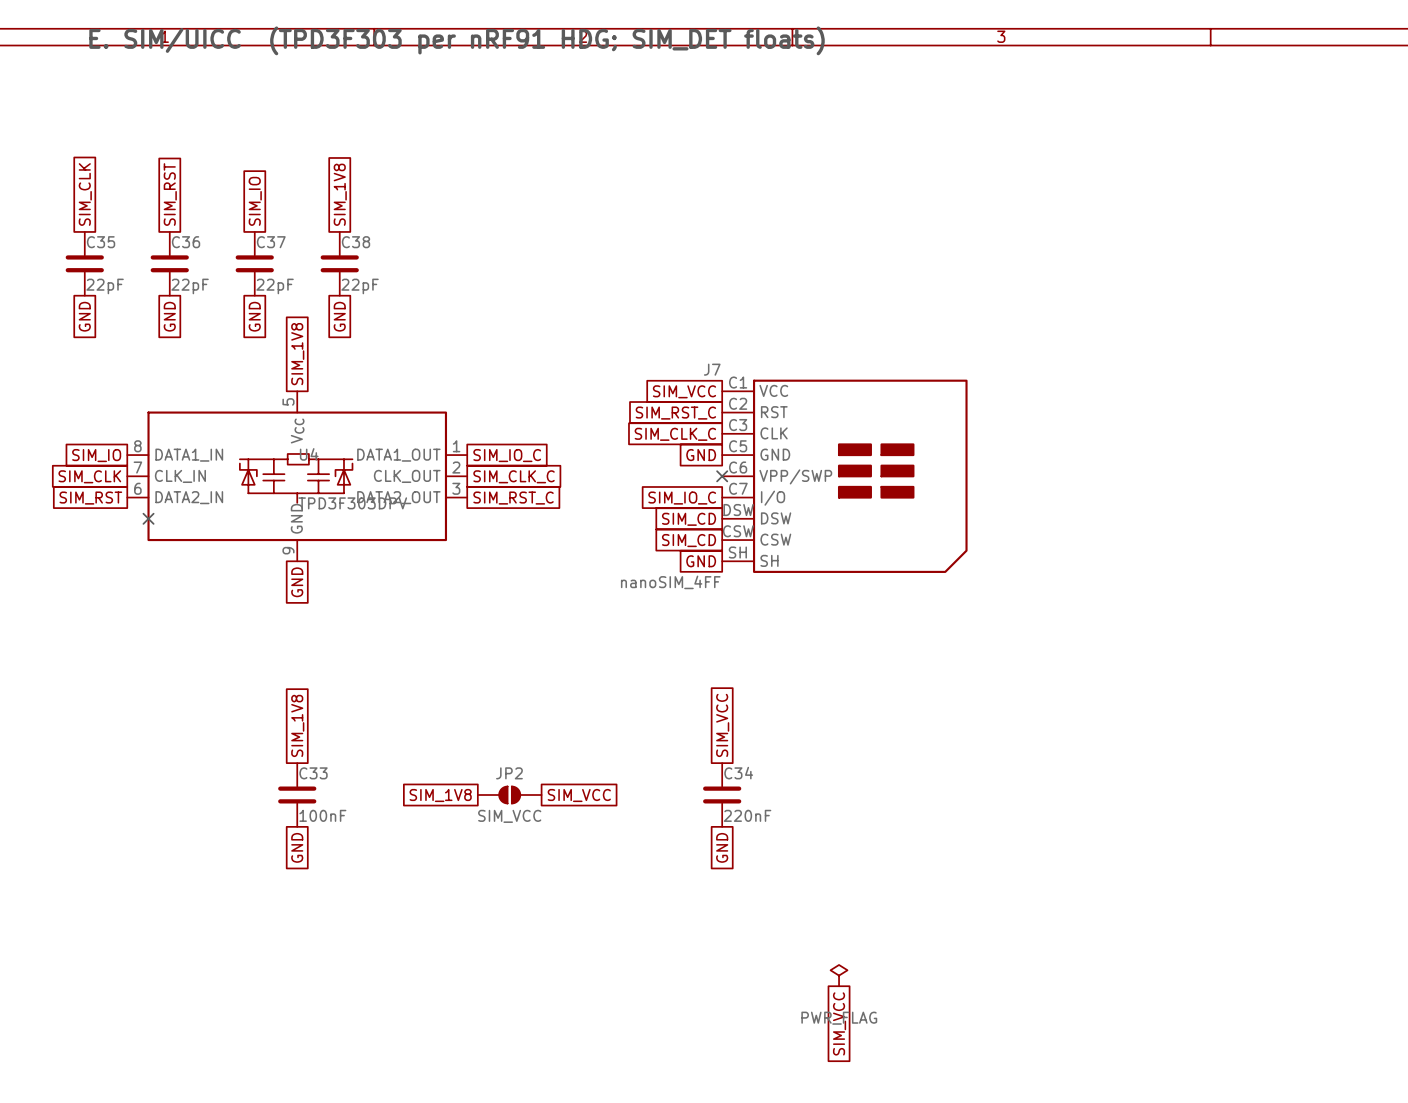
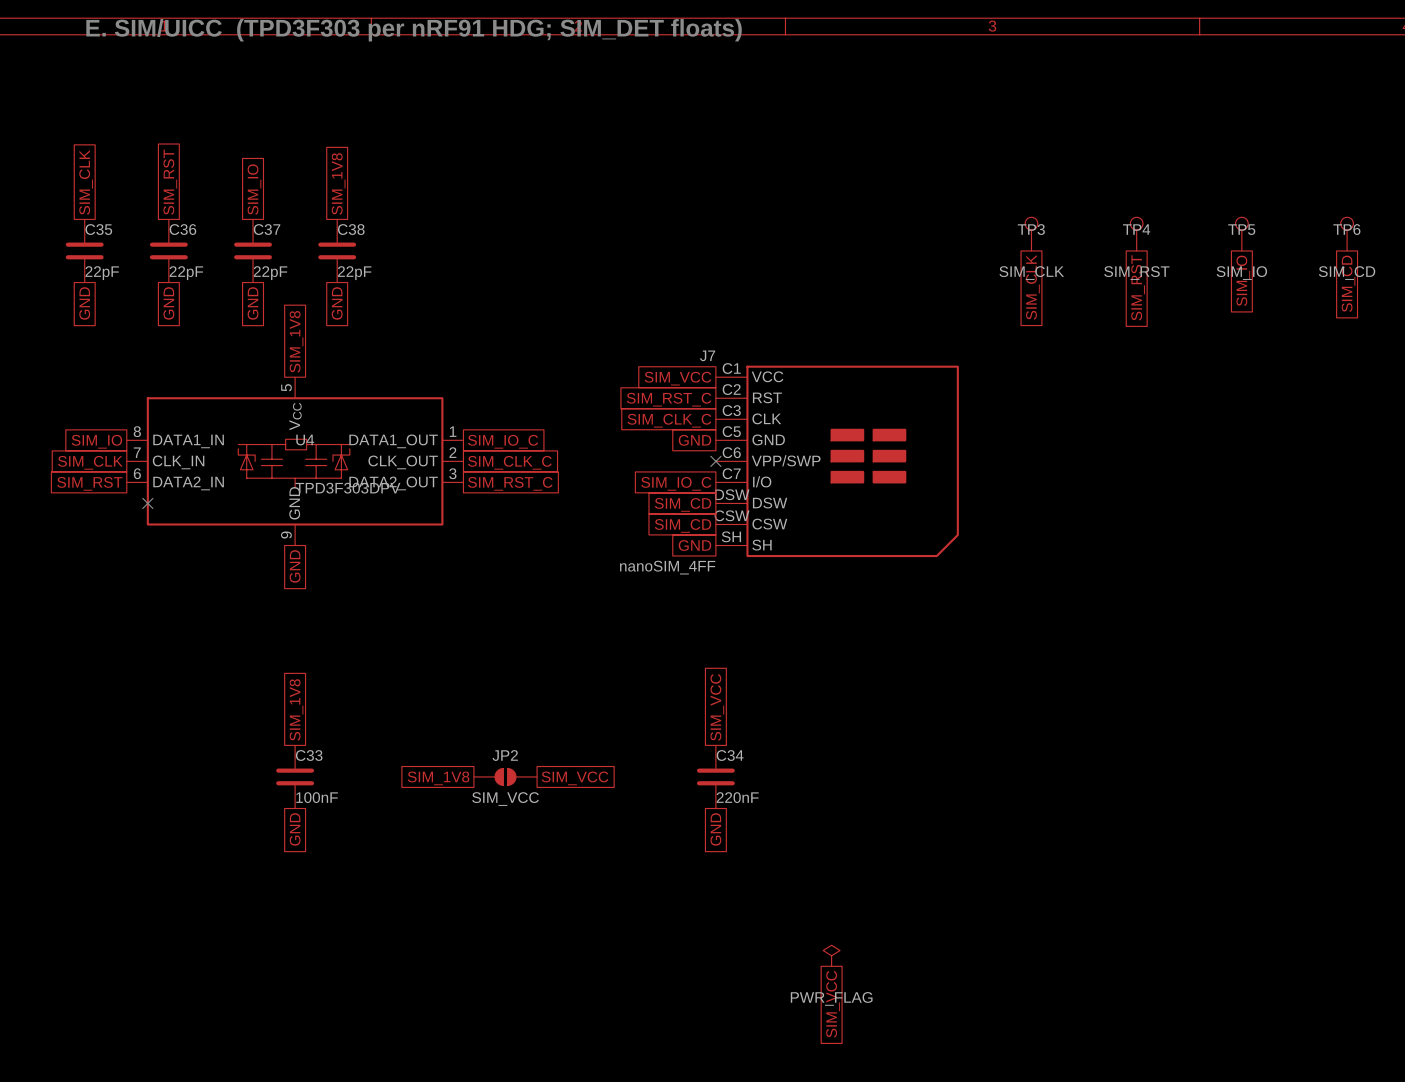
TP3: none -> SIM_CLK (1031, 234)
TP4: none -> SIM_RST (1136, 234)
TP5: none -> SIM_IO (1241, 234)
TP6: none -> SIM_CD (1347, 234)
global label: none -> SIM_IO (1243, 280)
global label: none -> SIM_CD (1348, 283)
global label: none -> SIM_RST (1138, 287)
global label: none -> SIM_CLK (1032, 287)

